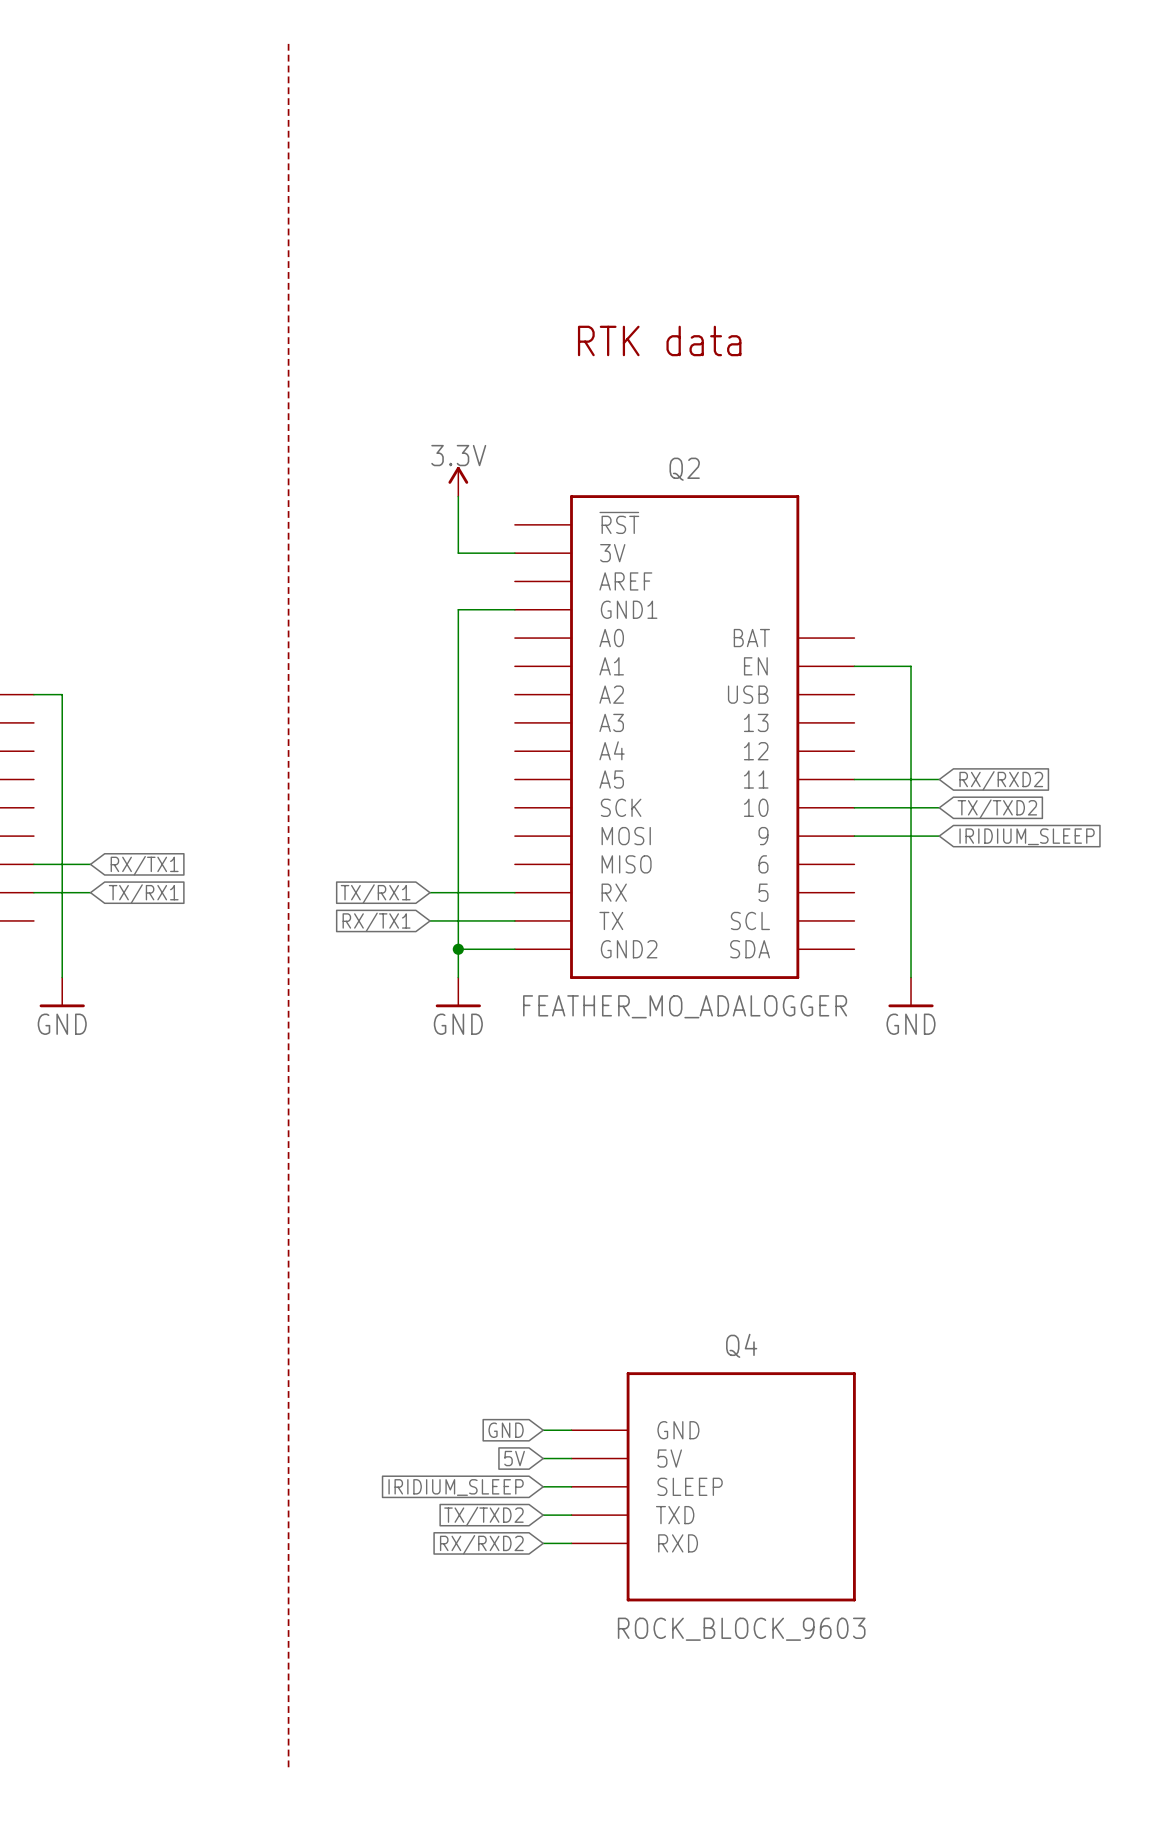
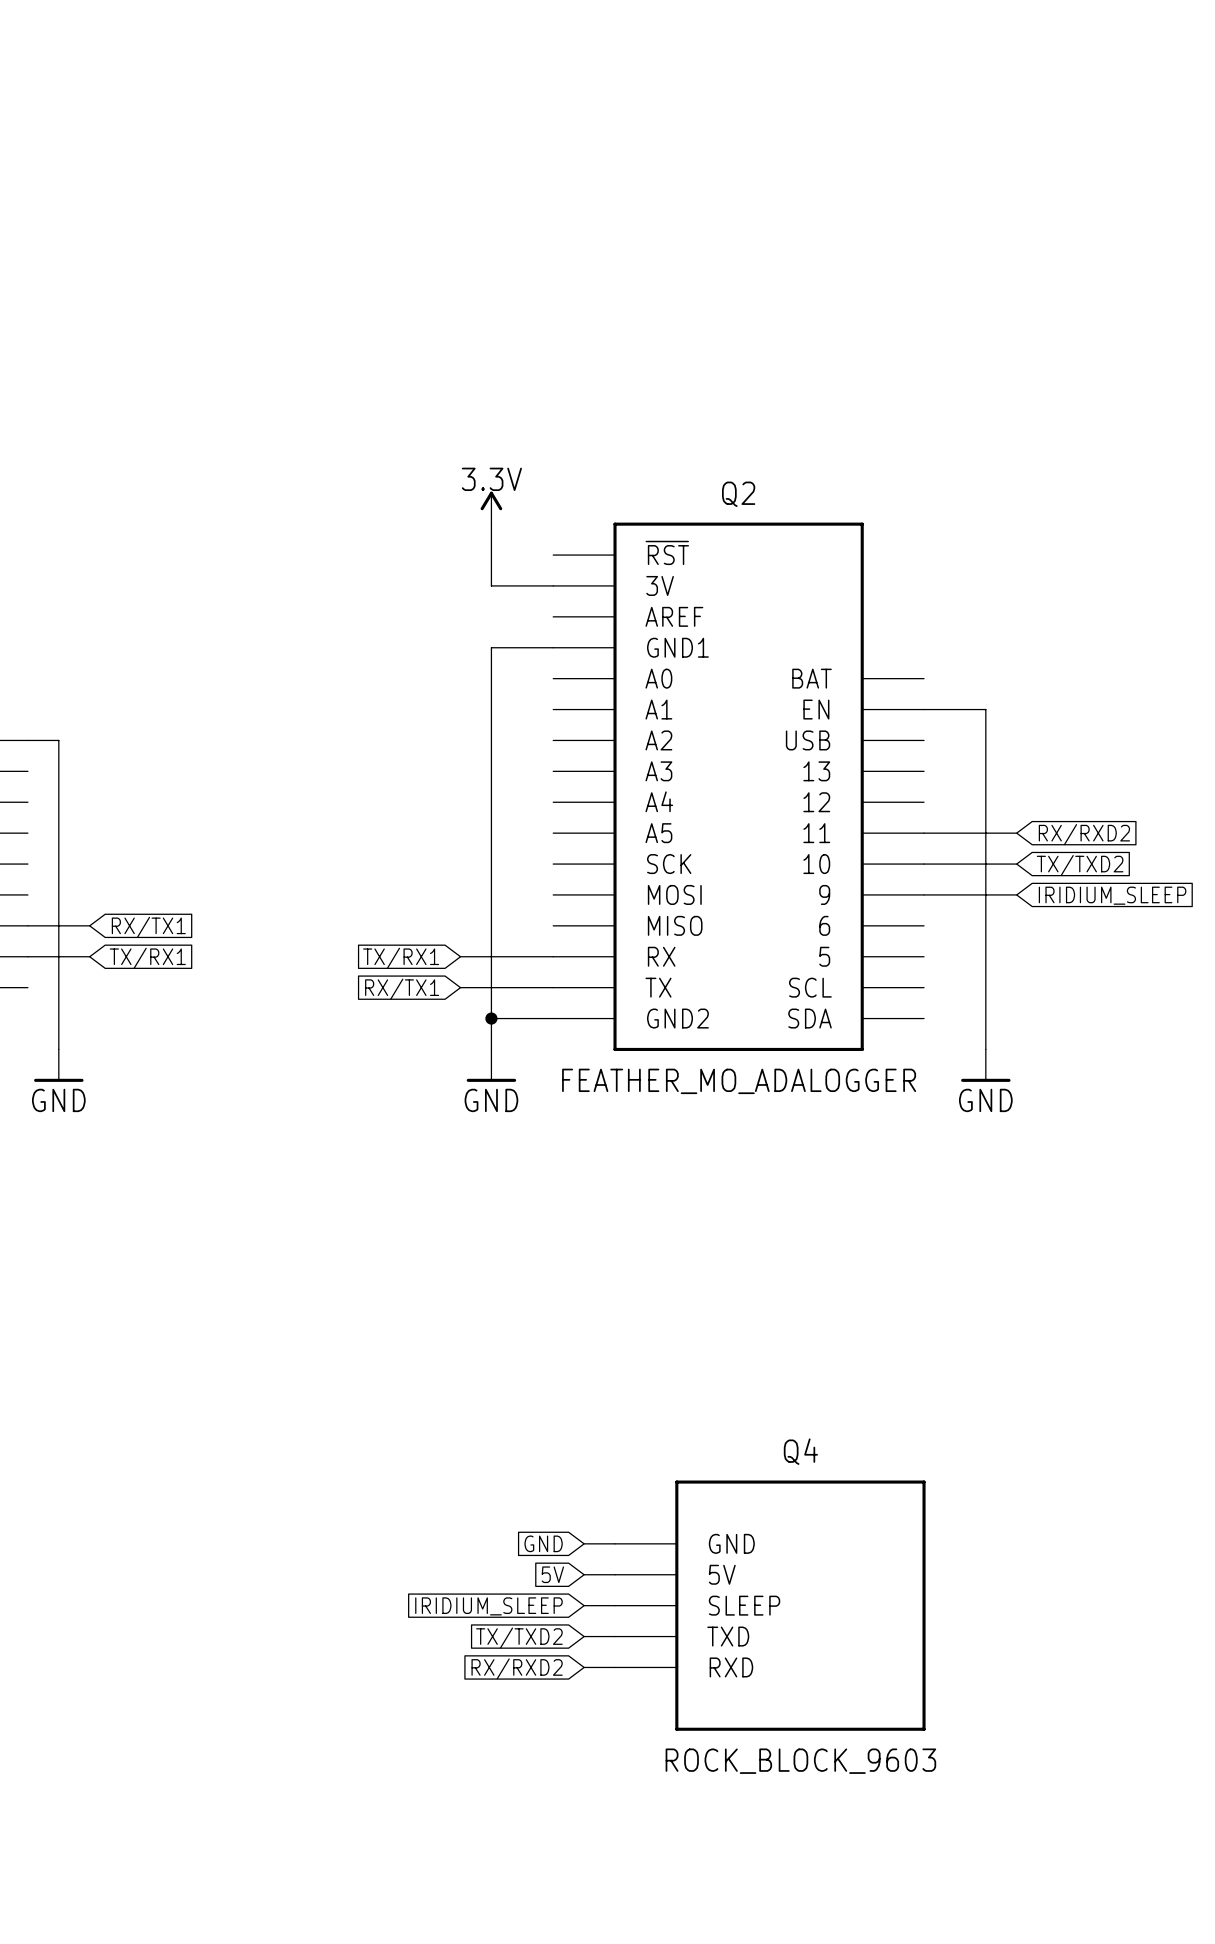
line: (288, 43) (288, 1769) -> none
text: RTK data (659, 340) -> none

